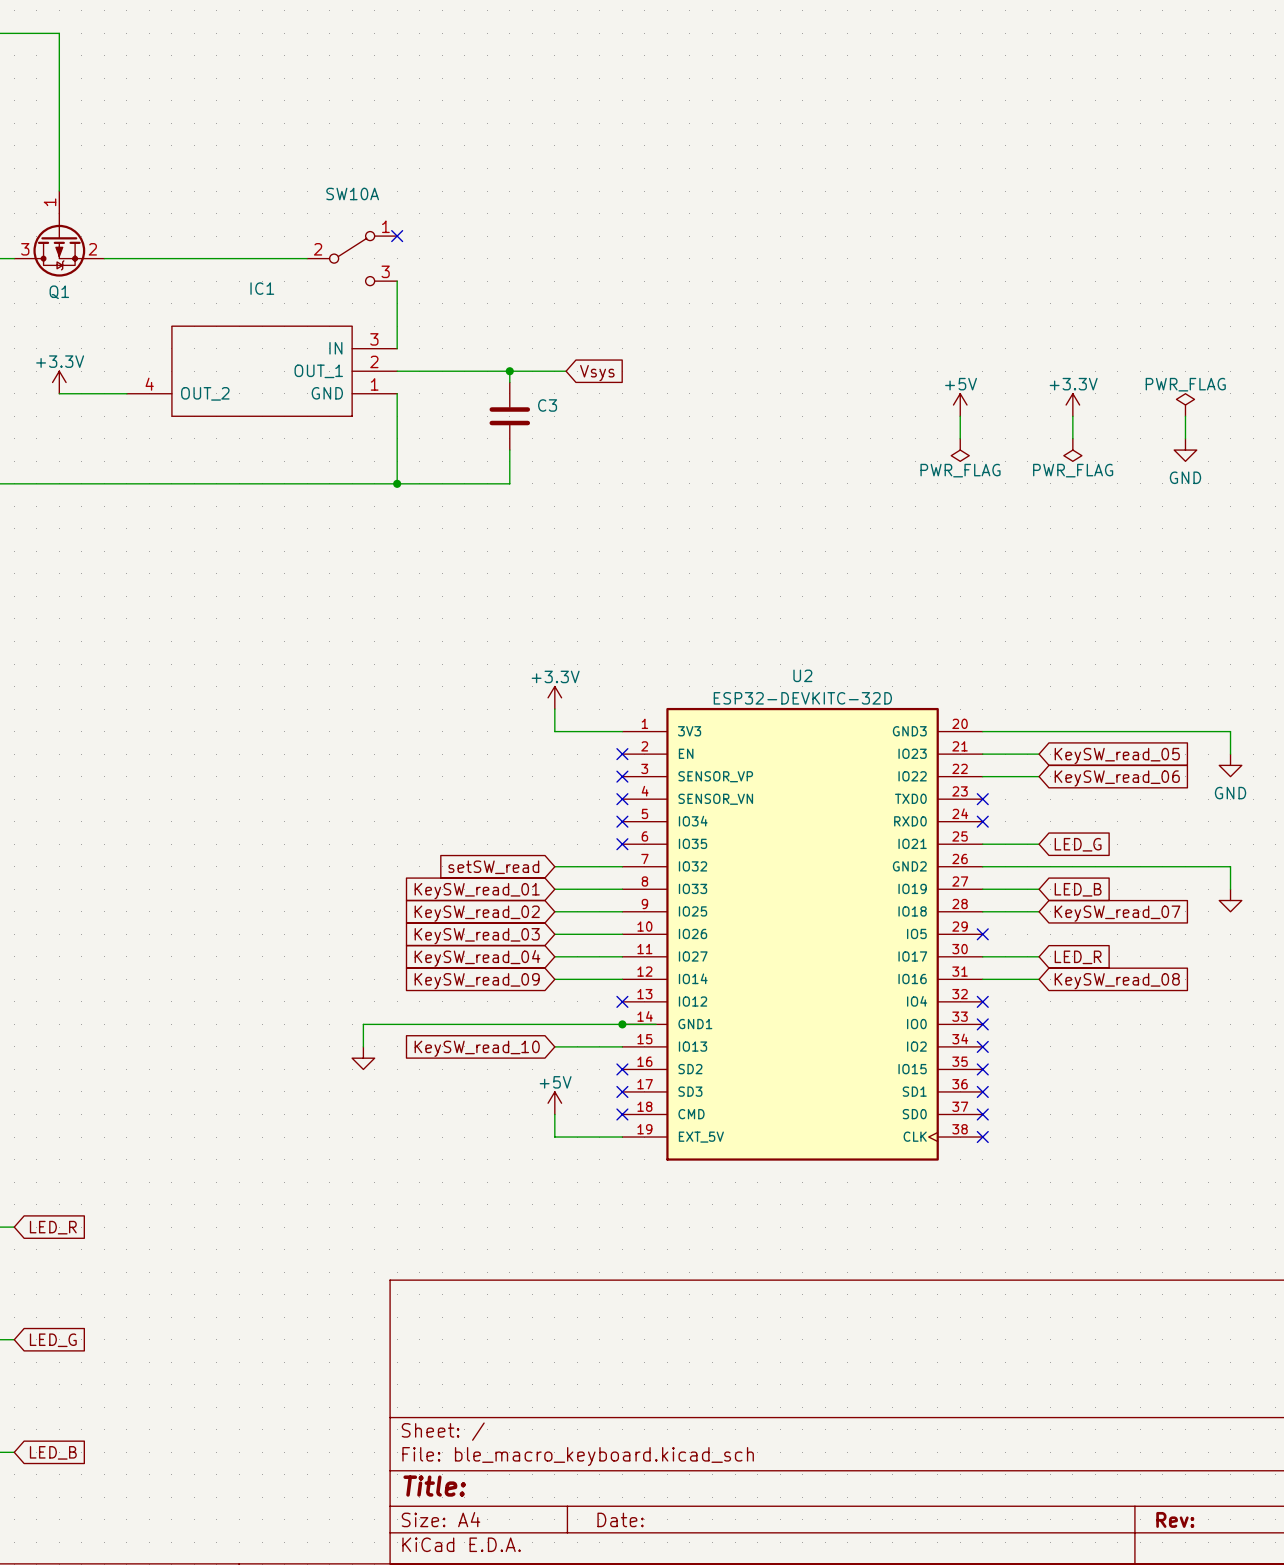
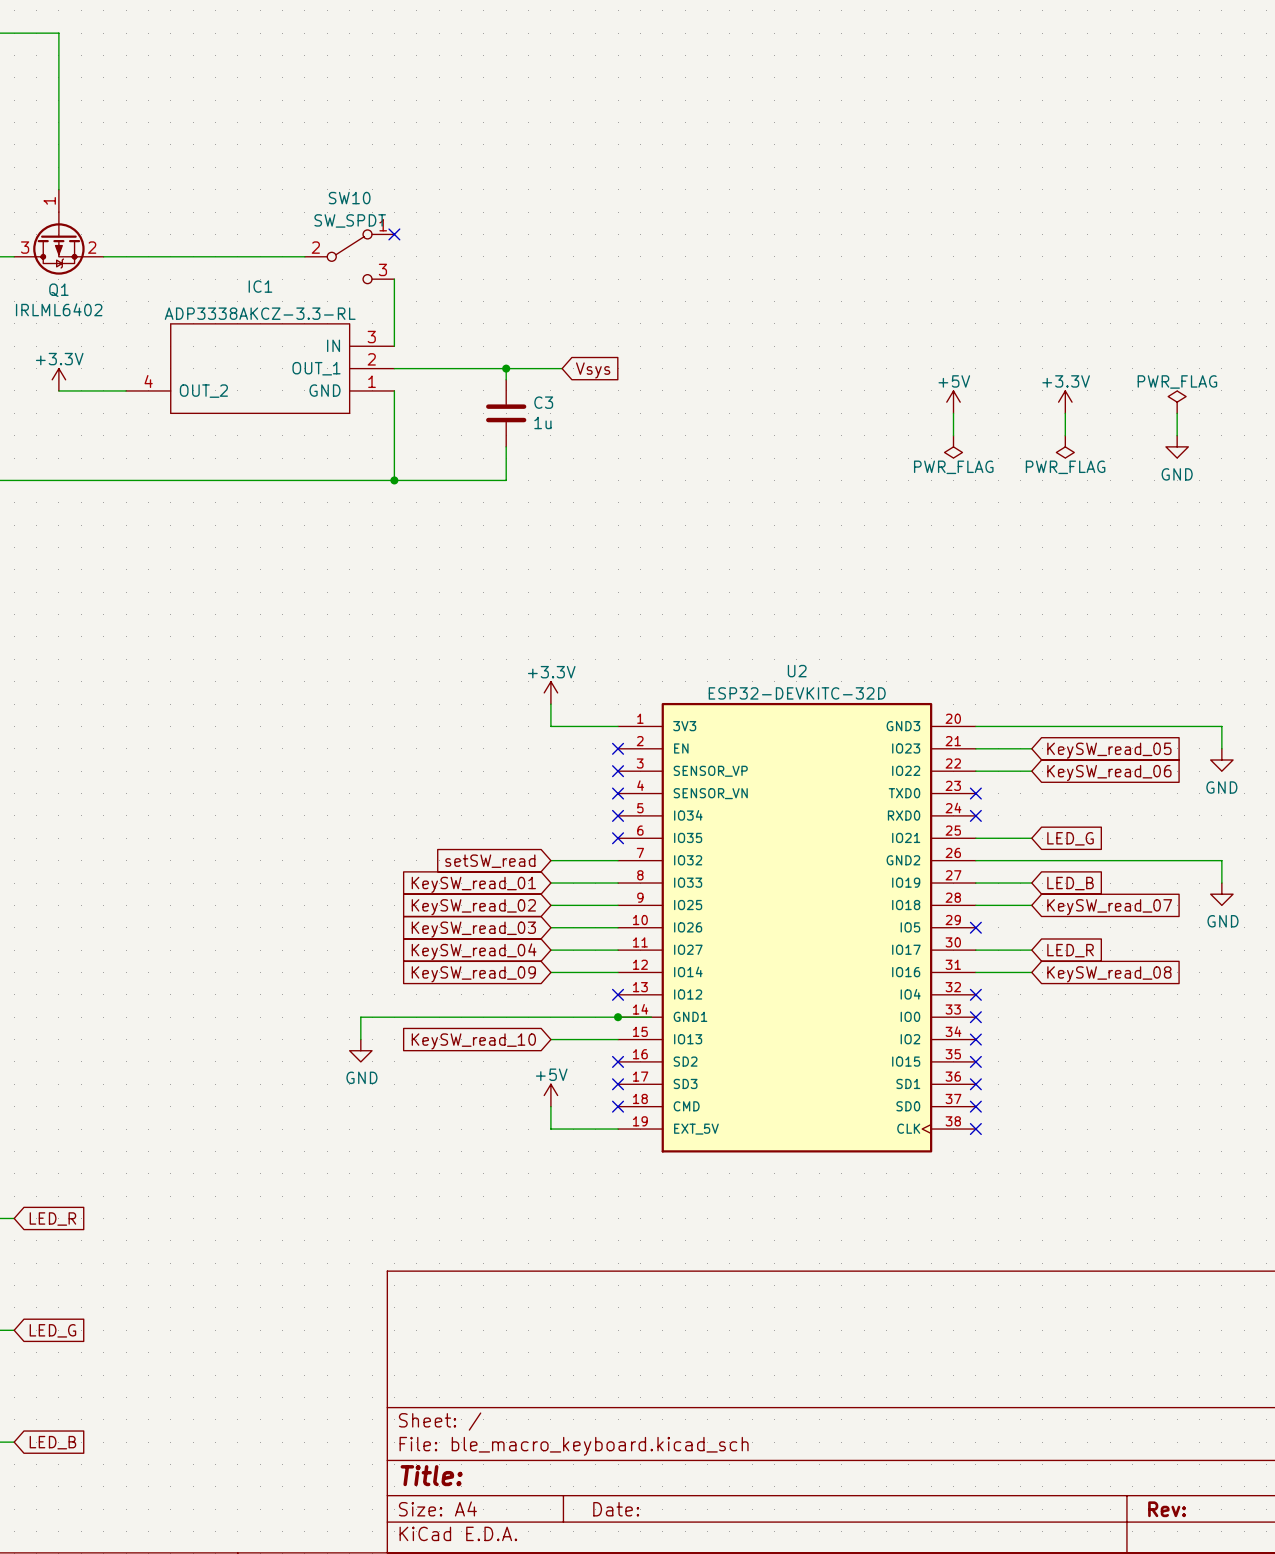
SW10A name: SW10A (352, 193) -> SW10 (349, 198)
SW10A value: none -> SW_SPDT (350, 220)
Q1 value: none -> IRLML6402 (59, 309)
IC1 value: none -> ADP3338AKCZ-3.3-RL (260, 313)
C3 value: none -> 1u (542, 422)
power symbol text: none -> GND (1222, 921)
power symbol text: none -> GND (361, 1077)

